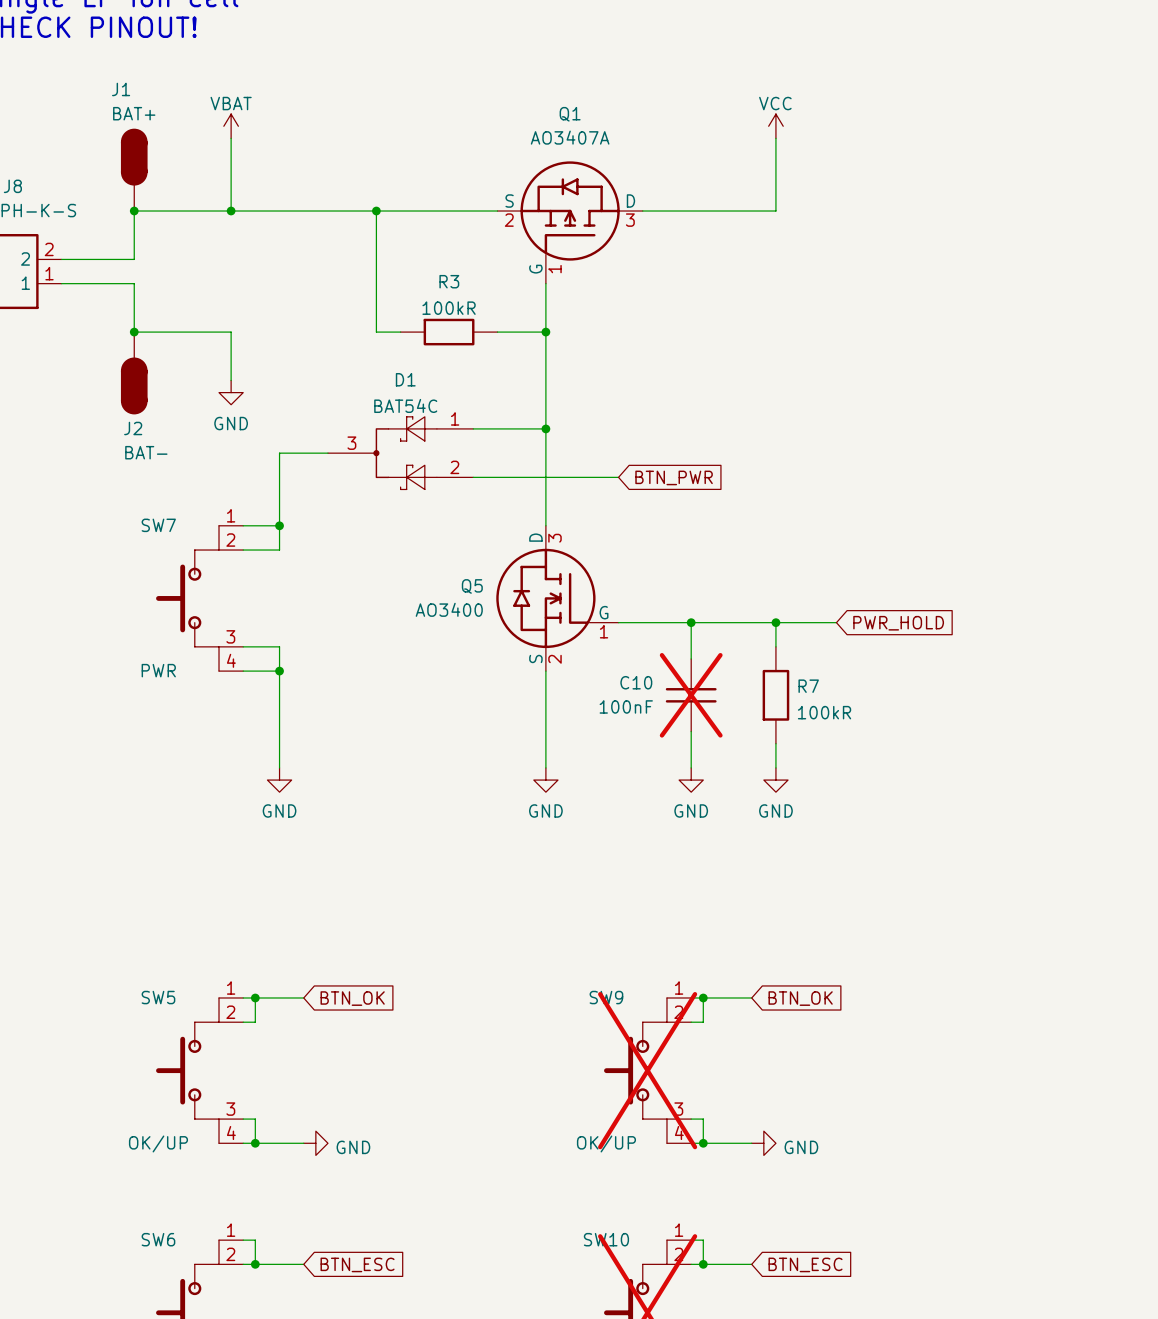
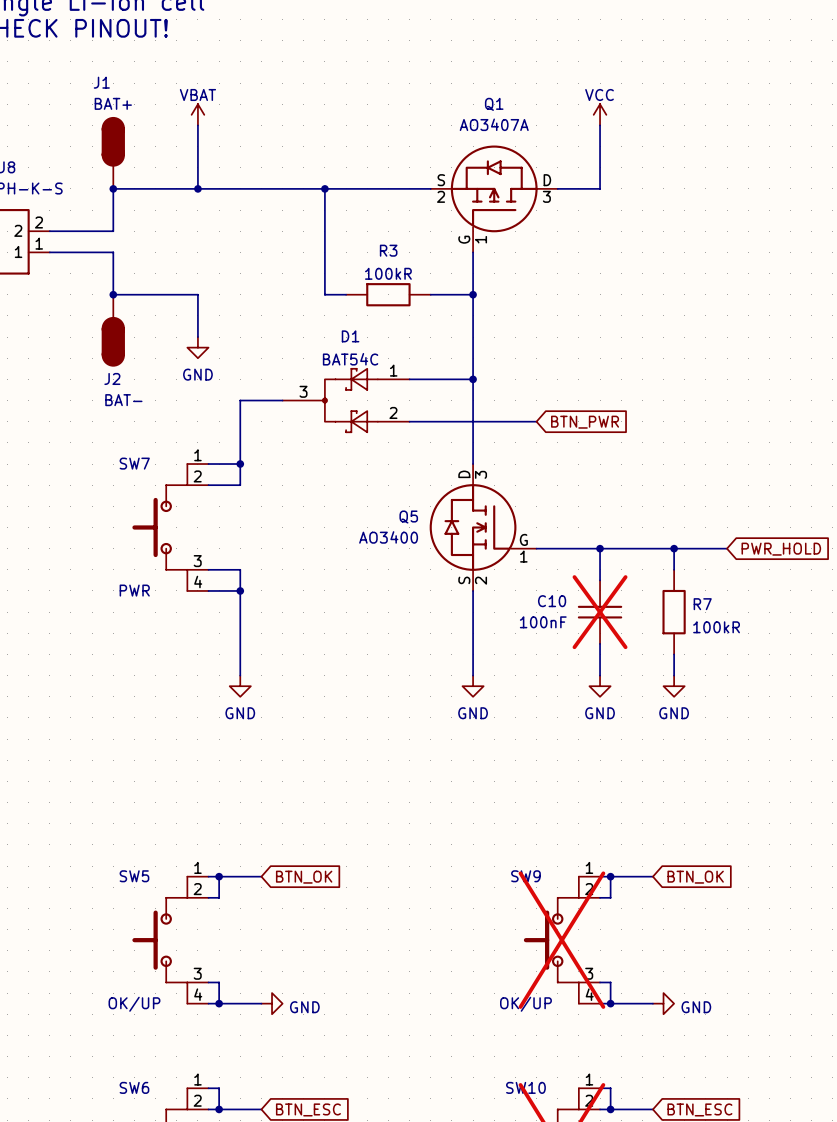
power symbol position: VCC (775, 126) -> VCC (600, 114)
wire: (775, 138) (775, 211) (691, 211) -> (600, 125) (600, 188)

